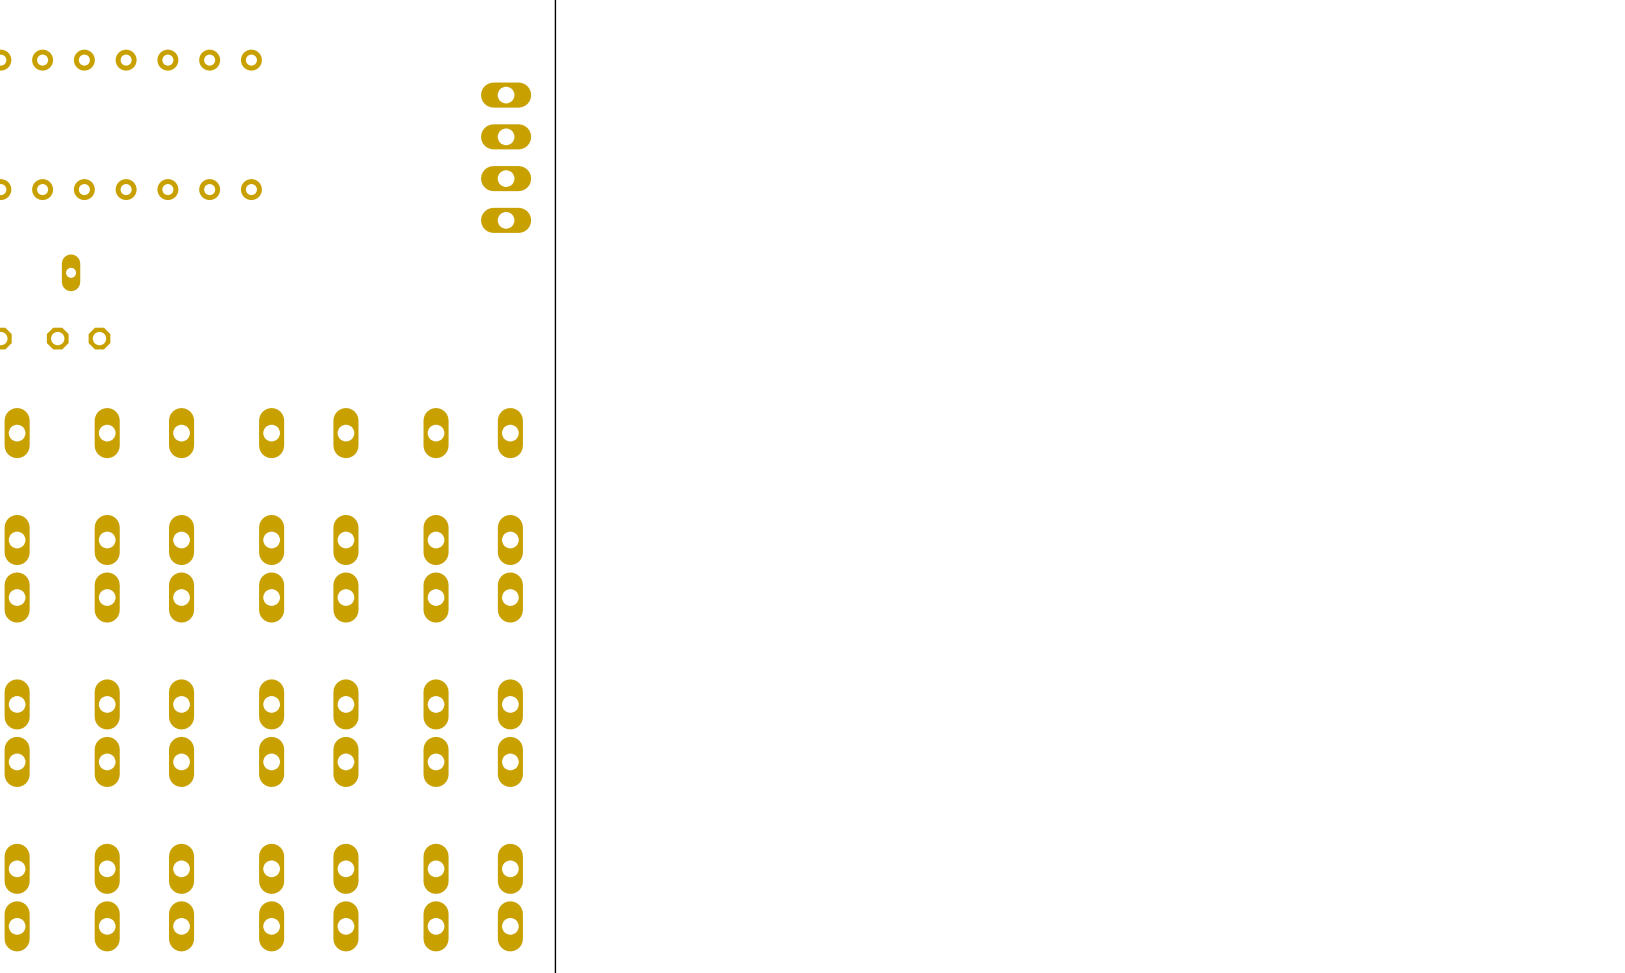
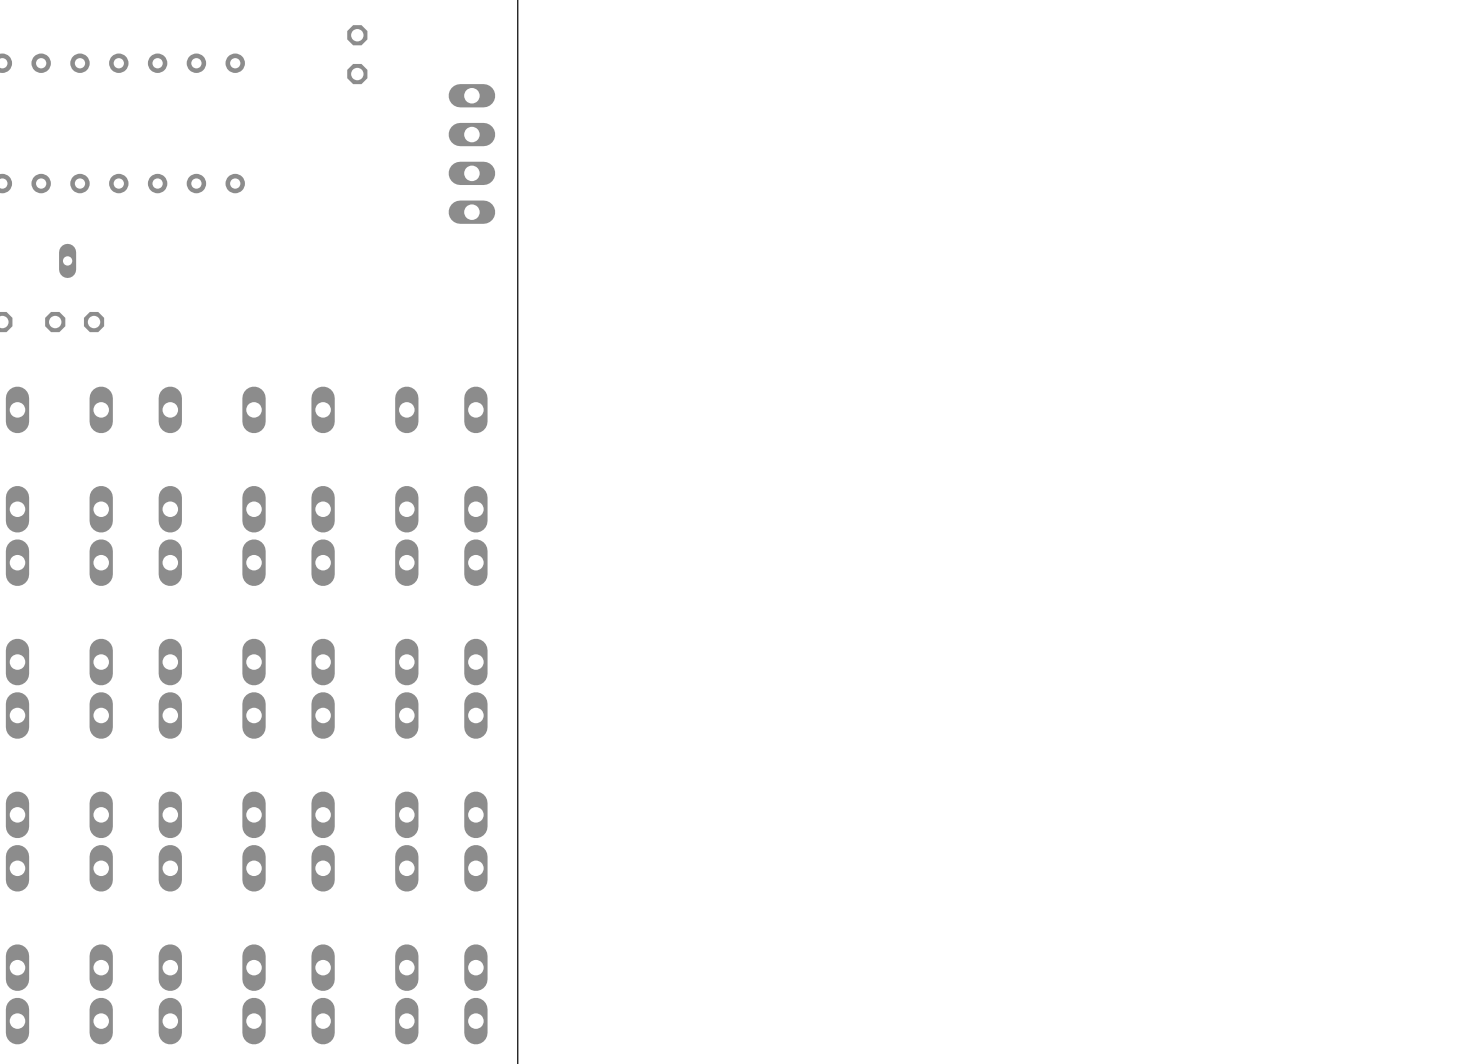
part: none -> (357, 54)

